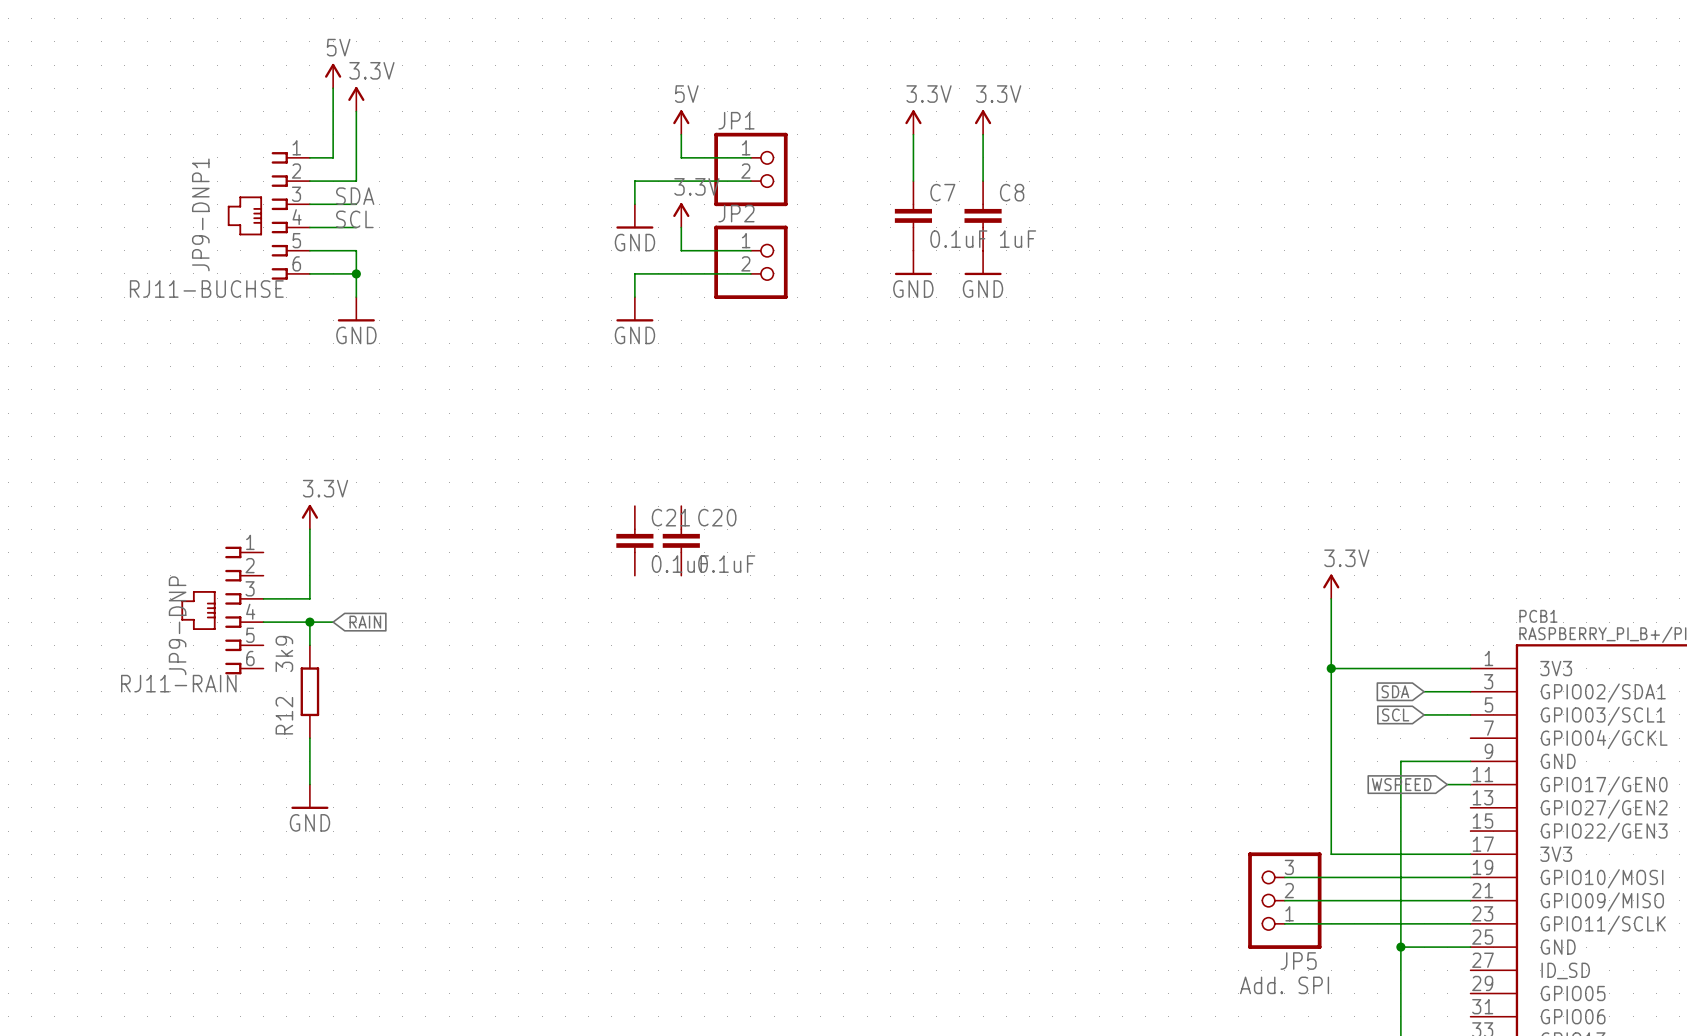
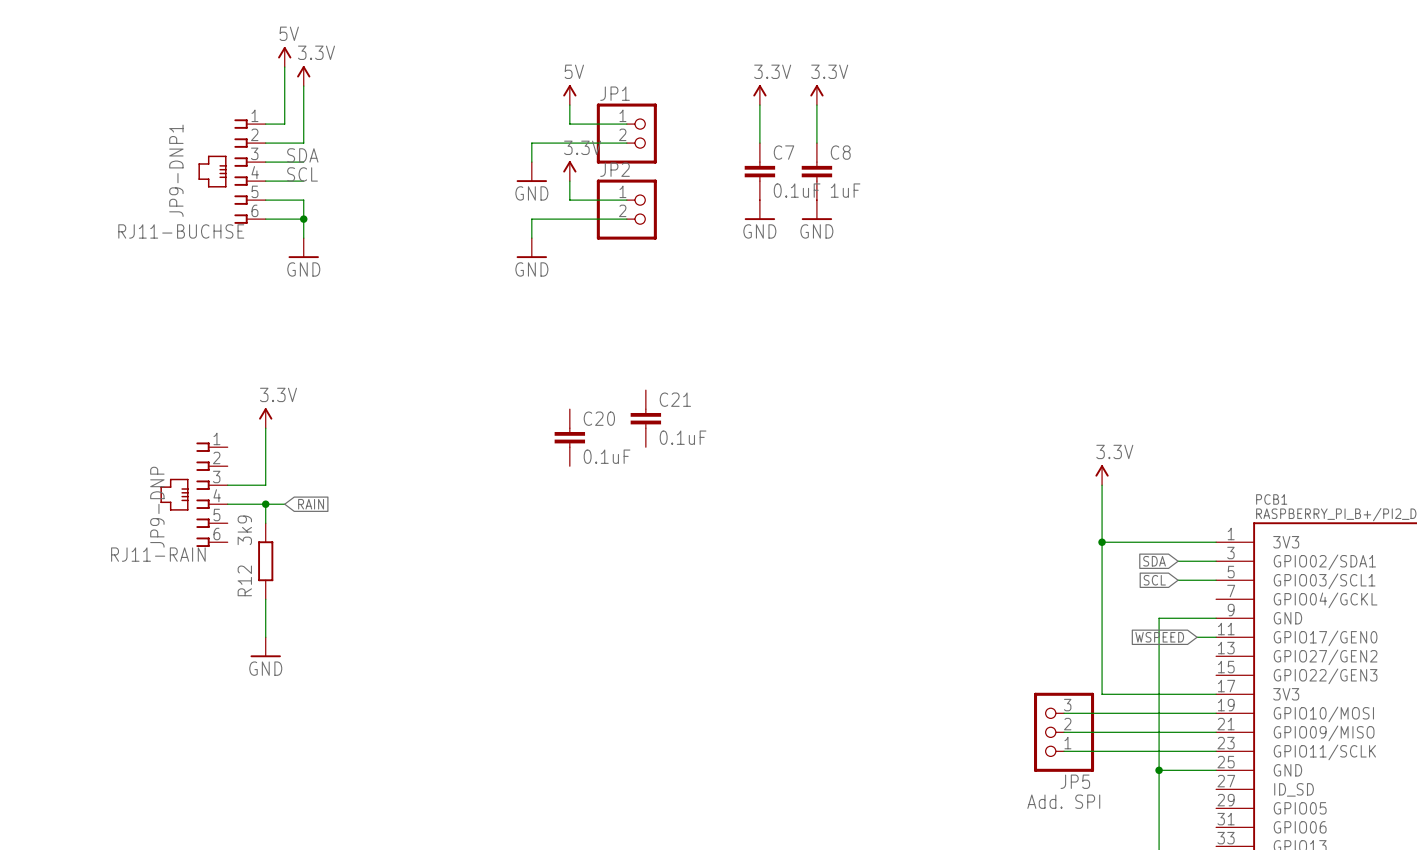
C21 position: (634, 540) -> (645, 418)

